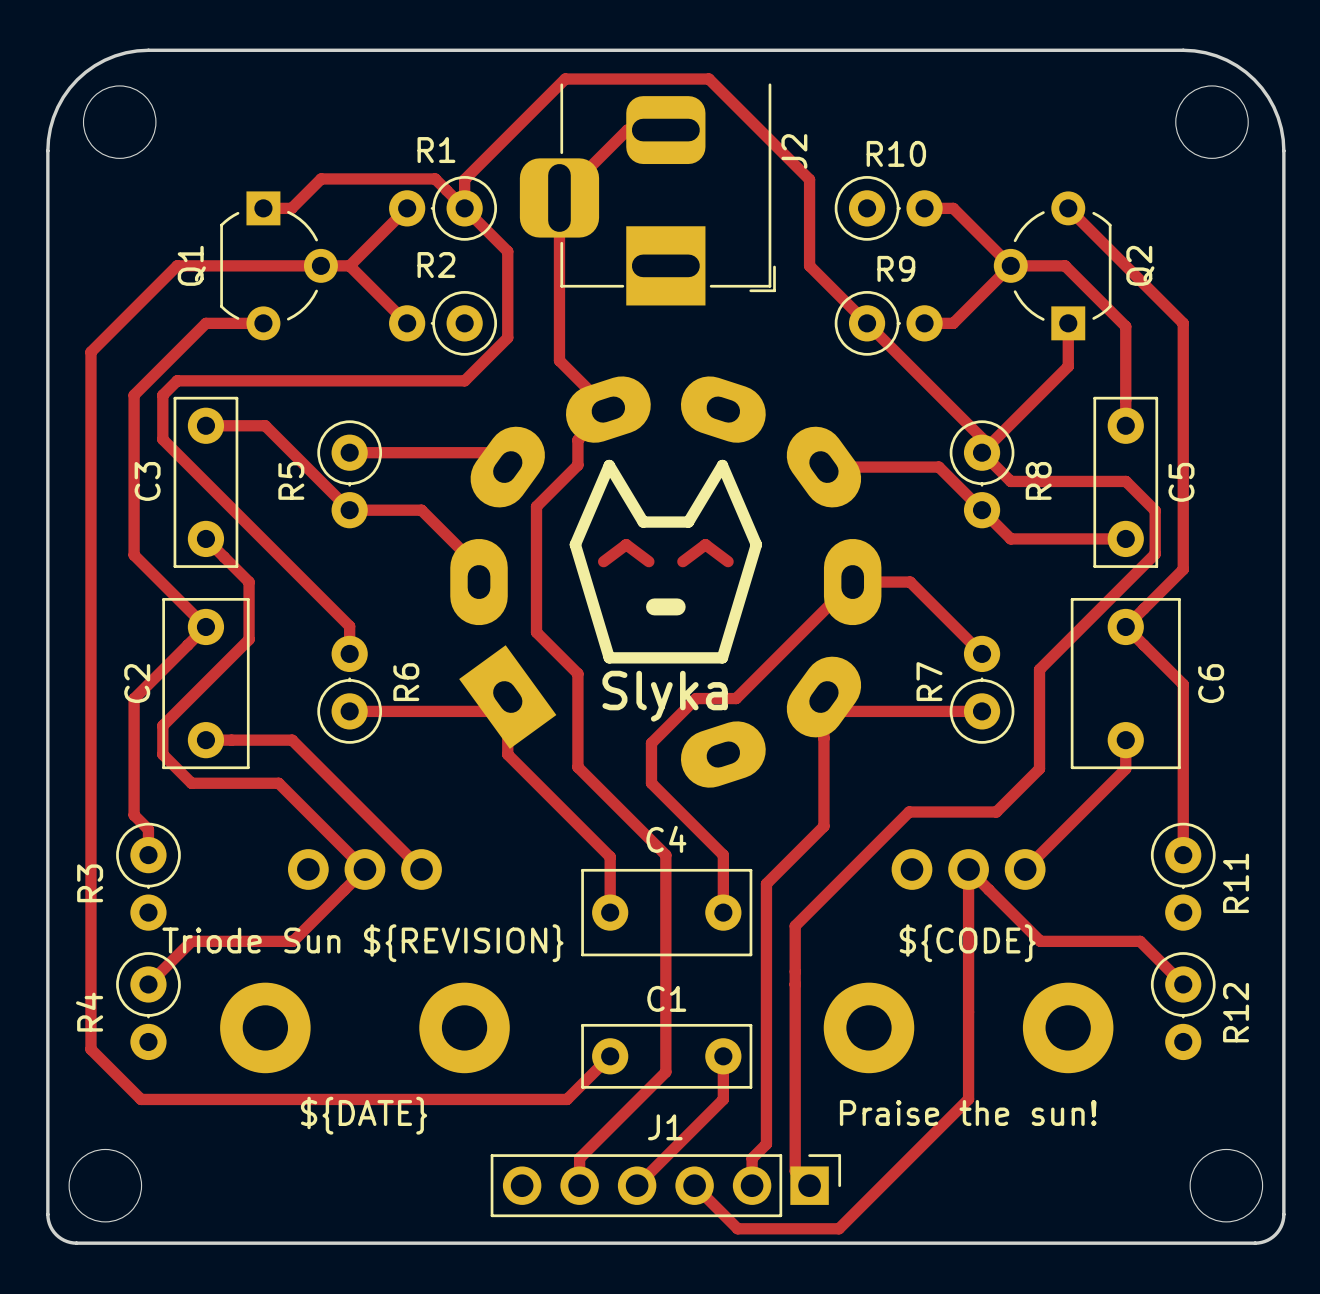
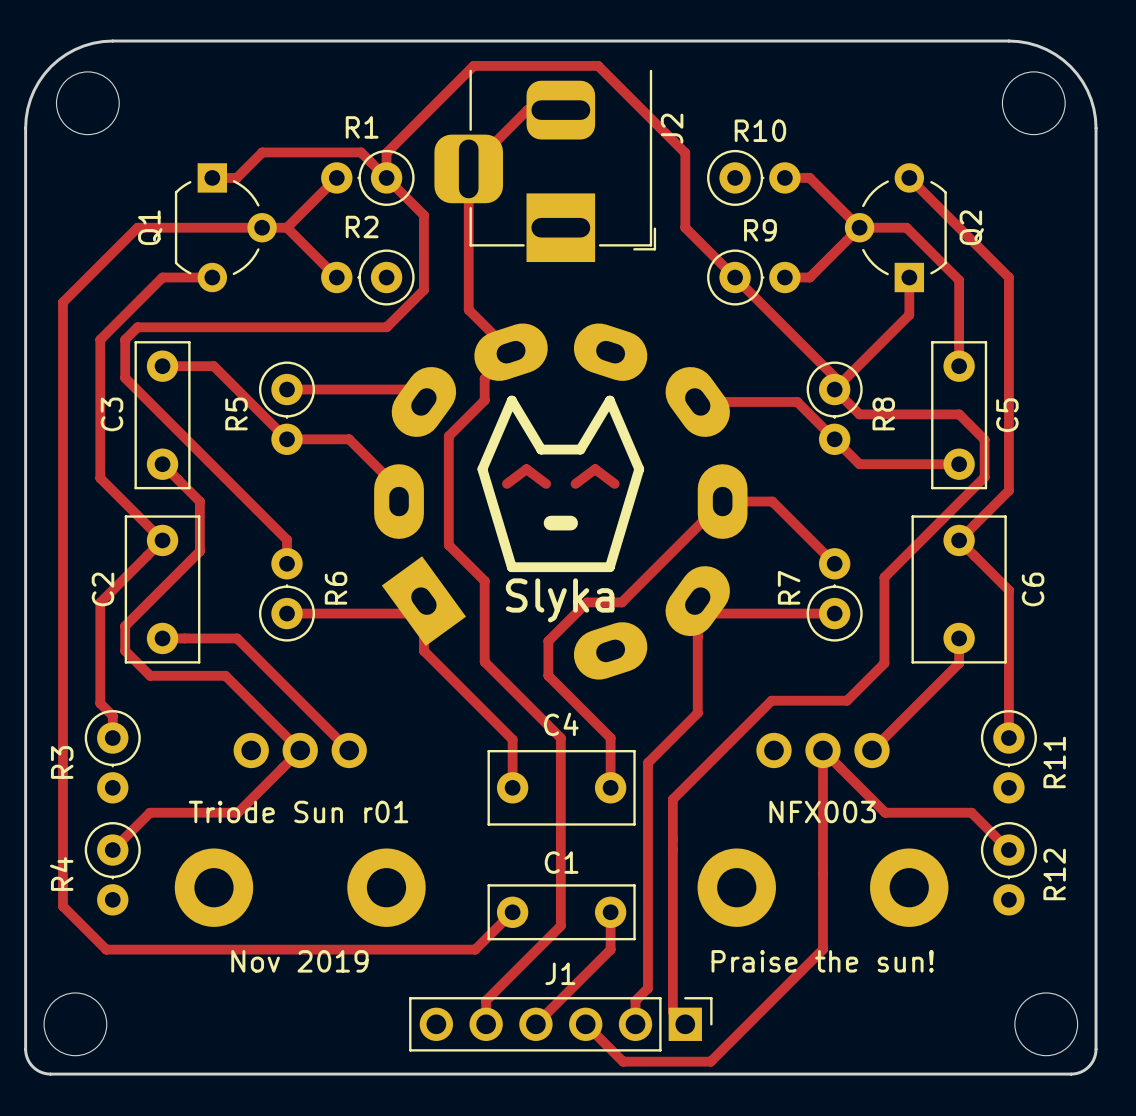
text: Triode Sun ${REVISION} (362, 943) -> Triode Sun r01 (298, 811)
text: ${CODE} (967, 943) -> NFX003 (822, 811)
text: ${DATE} (364, 1115) -> Nov 2019 (299, 961)

